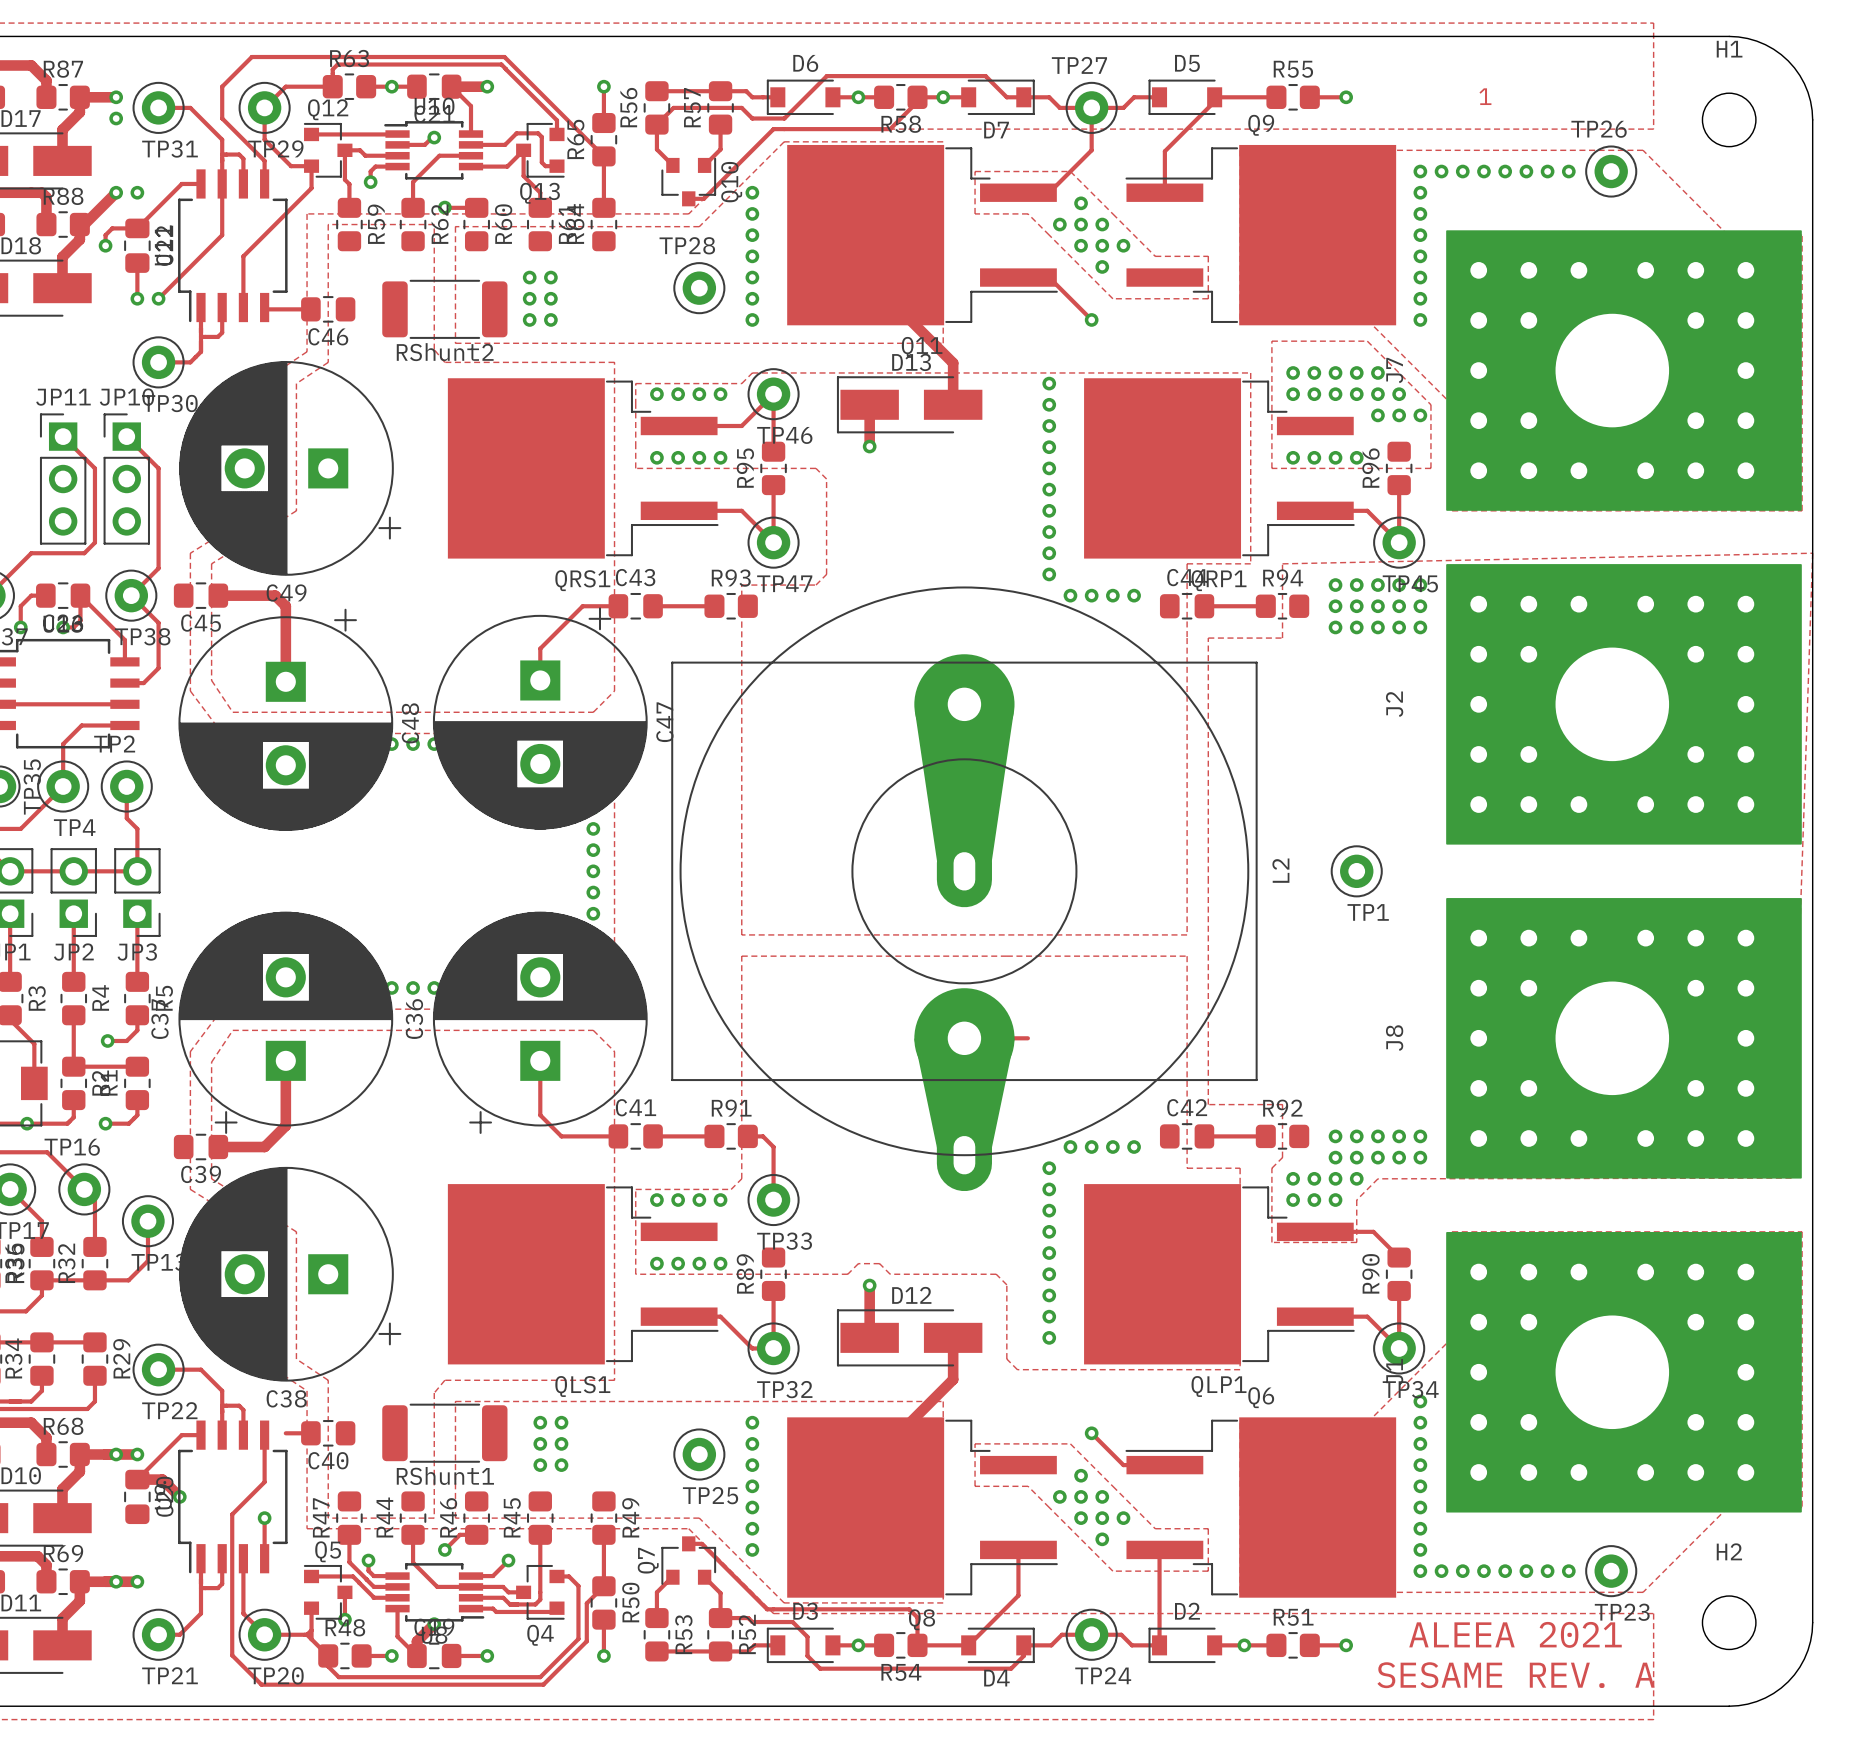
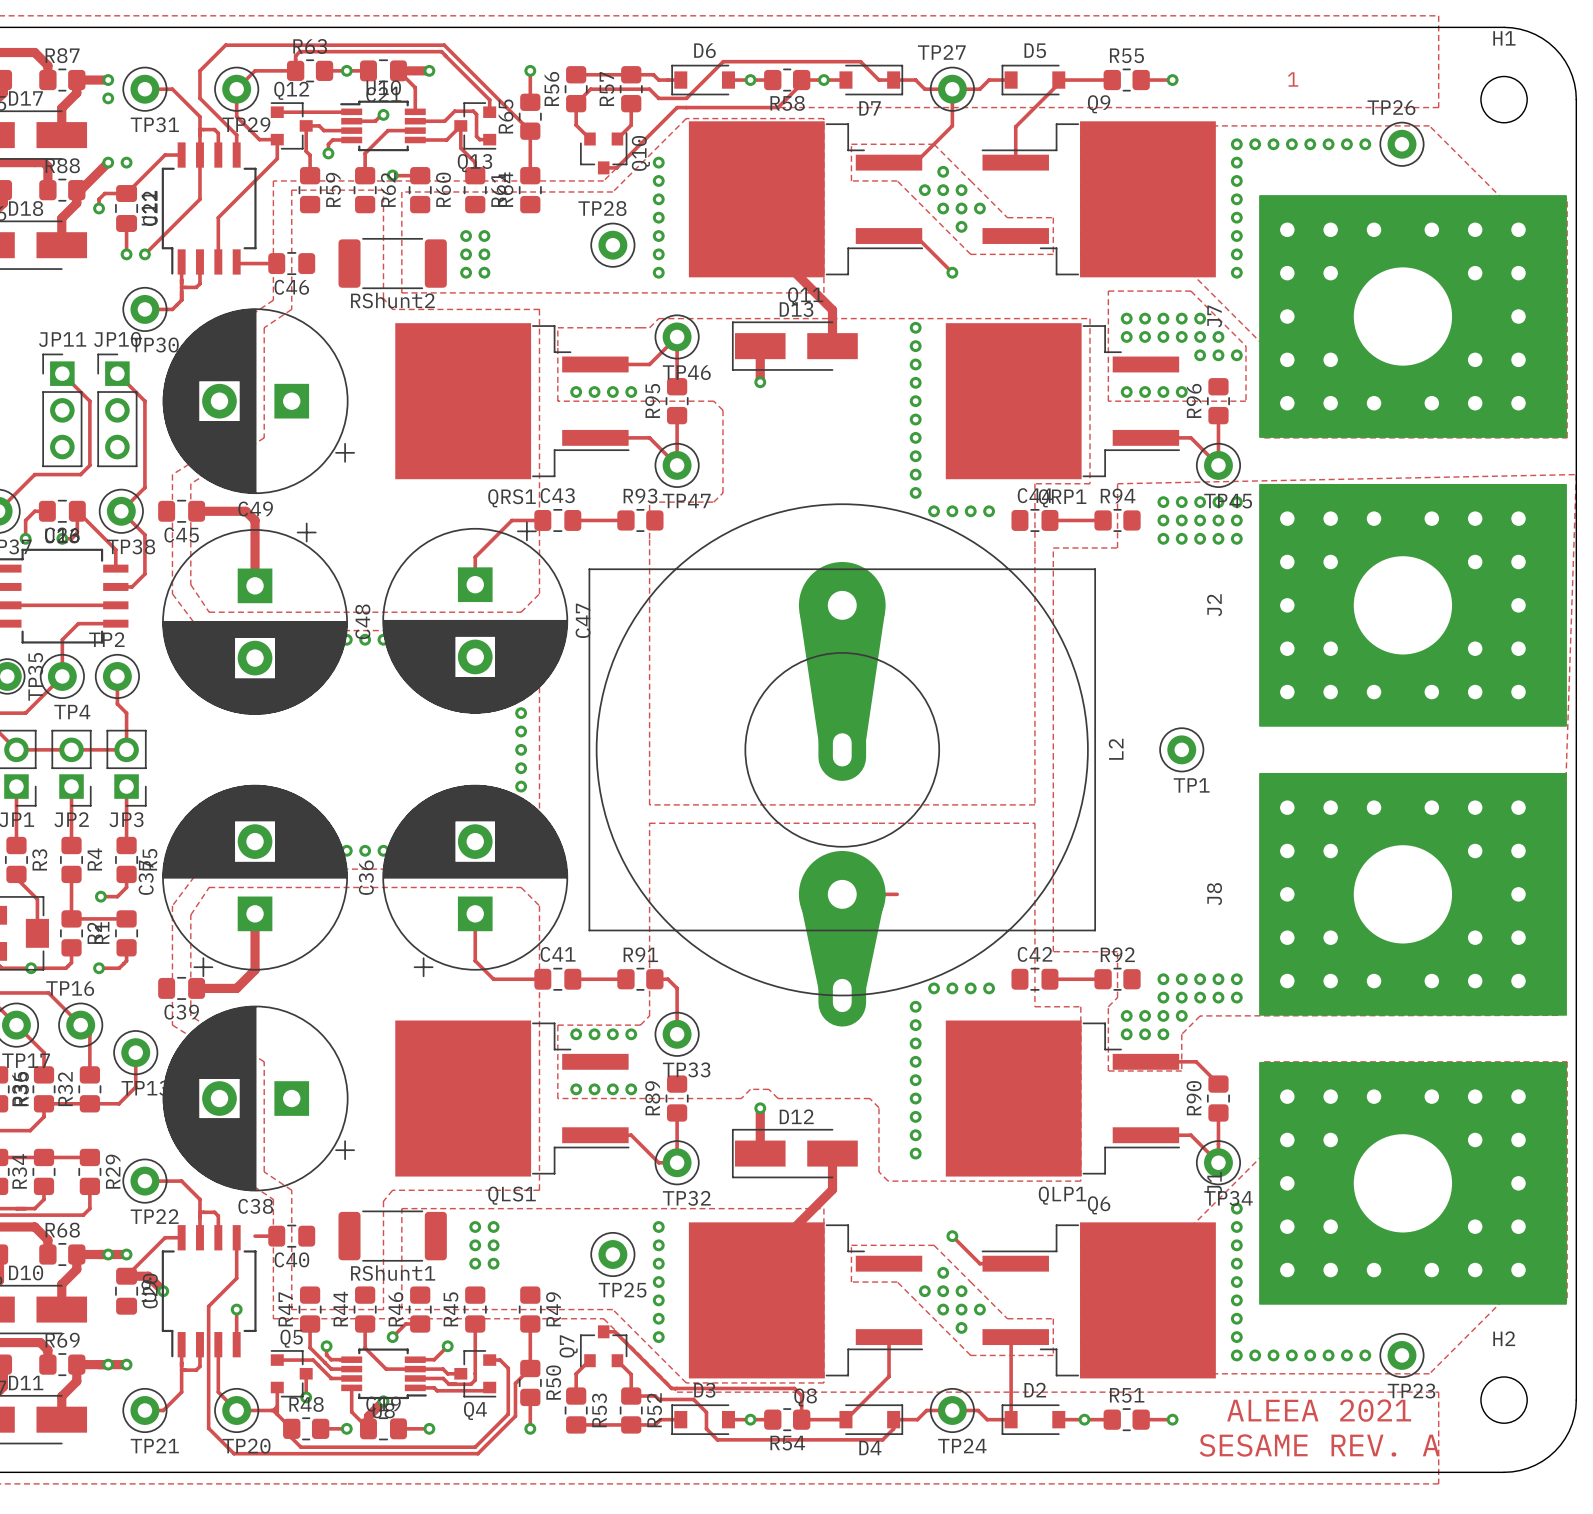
via: (656, 394) -> none
via: (678, 394) -> none
via: (699, 394) -> none
via: (720, 394) -> none

